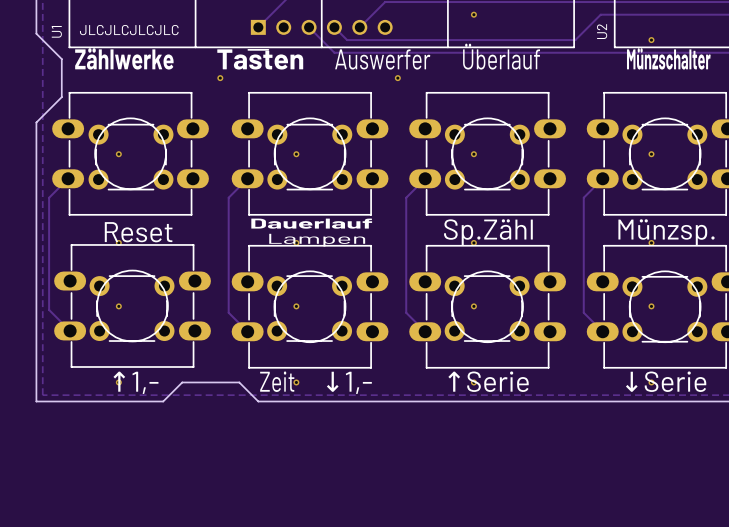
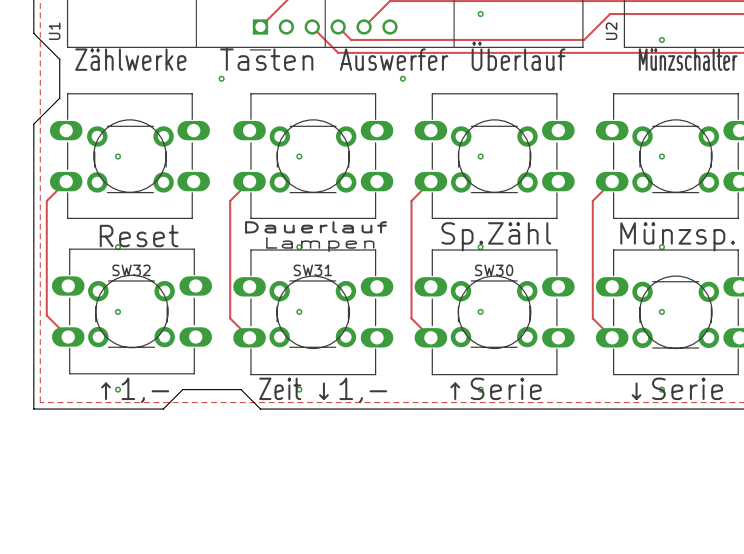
text: JLCJLCJLCJLC (129, 30) -> none
SW32 name: none -> SW32 (131, 270)
SW31 name: none -> SW31 (312, 270)
SW30 name: none -> SW30 (494, 270)

